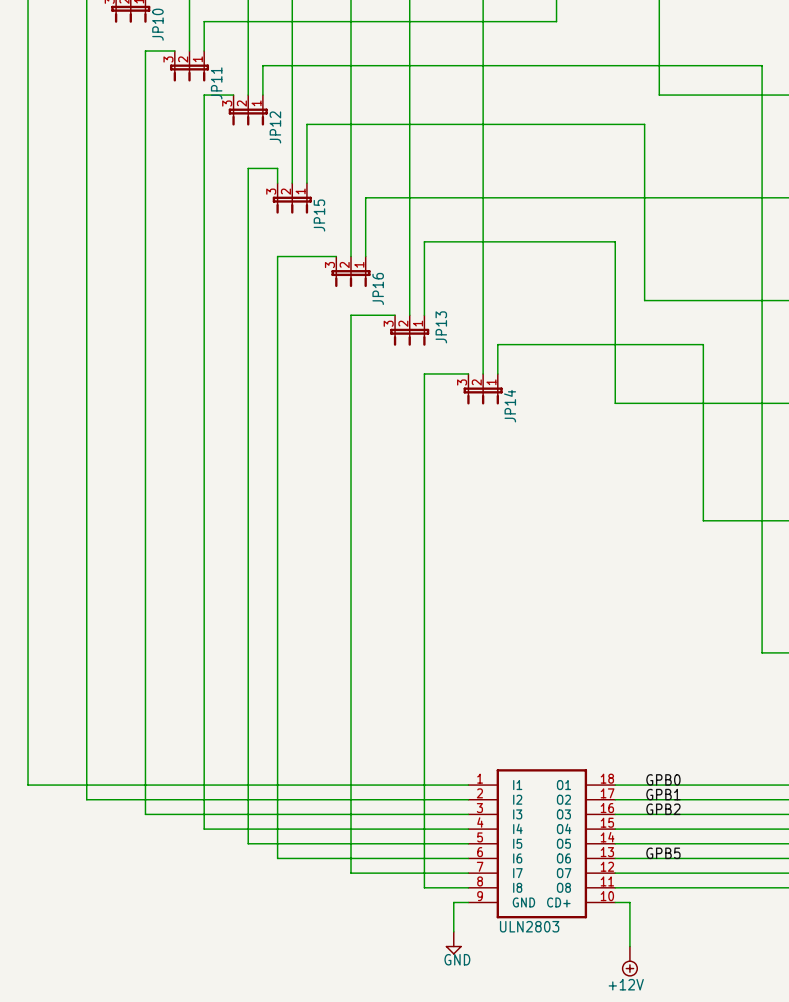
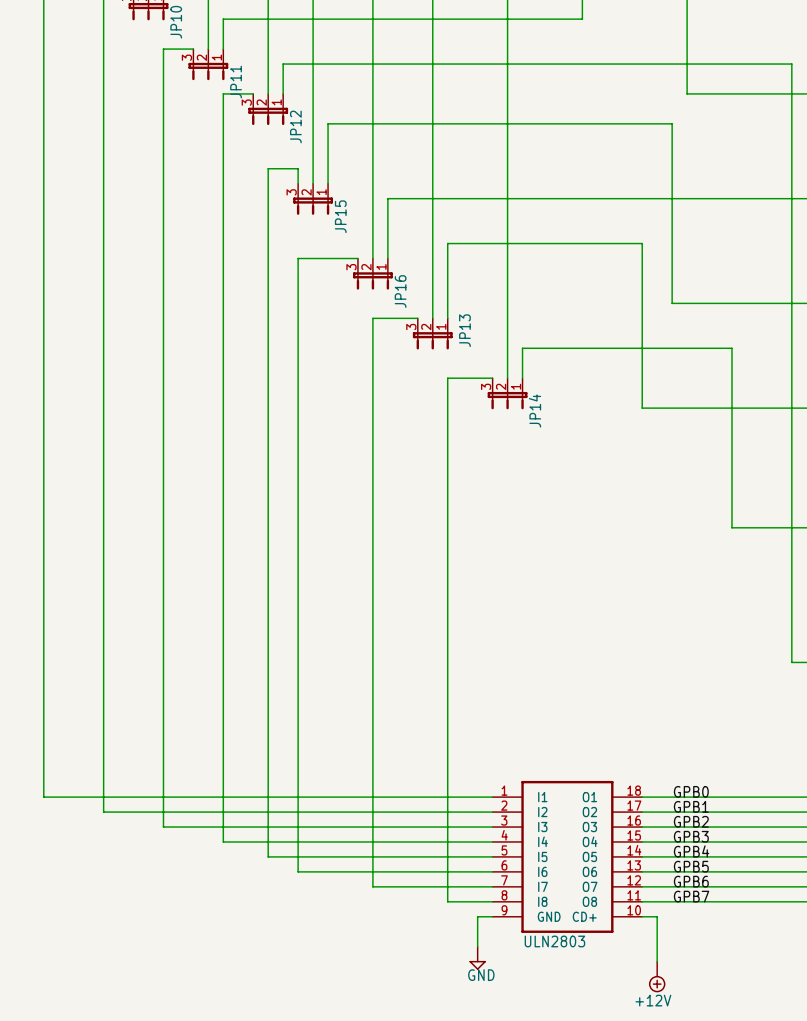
label: none -> GPB3 (691, 836)
label: none -> GPB4 (691, 851)
label: none -> GPB6 (691, 881)
label: none -> GPB7 (691, 896)

